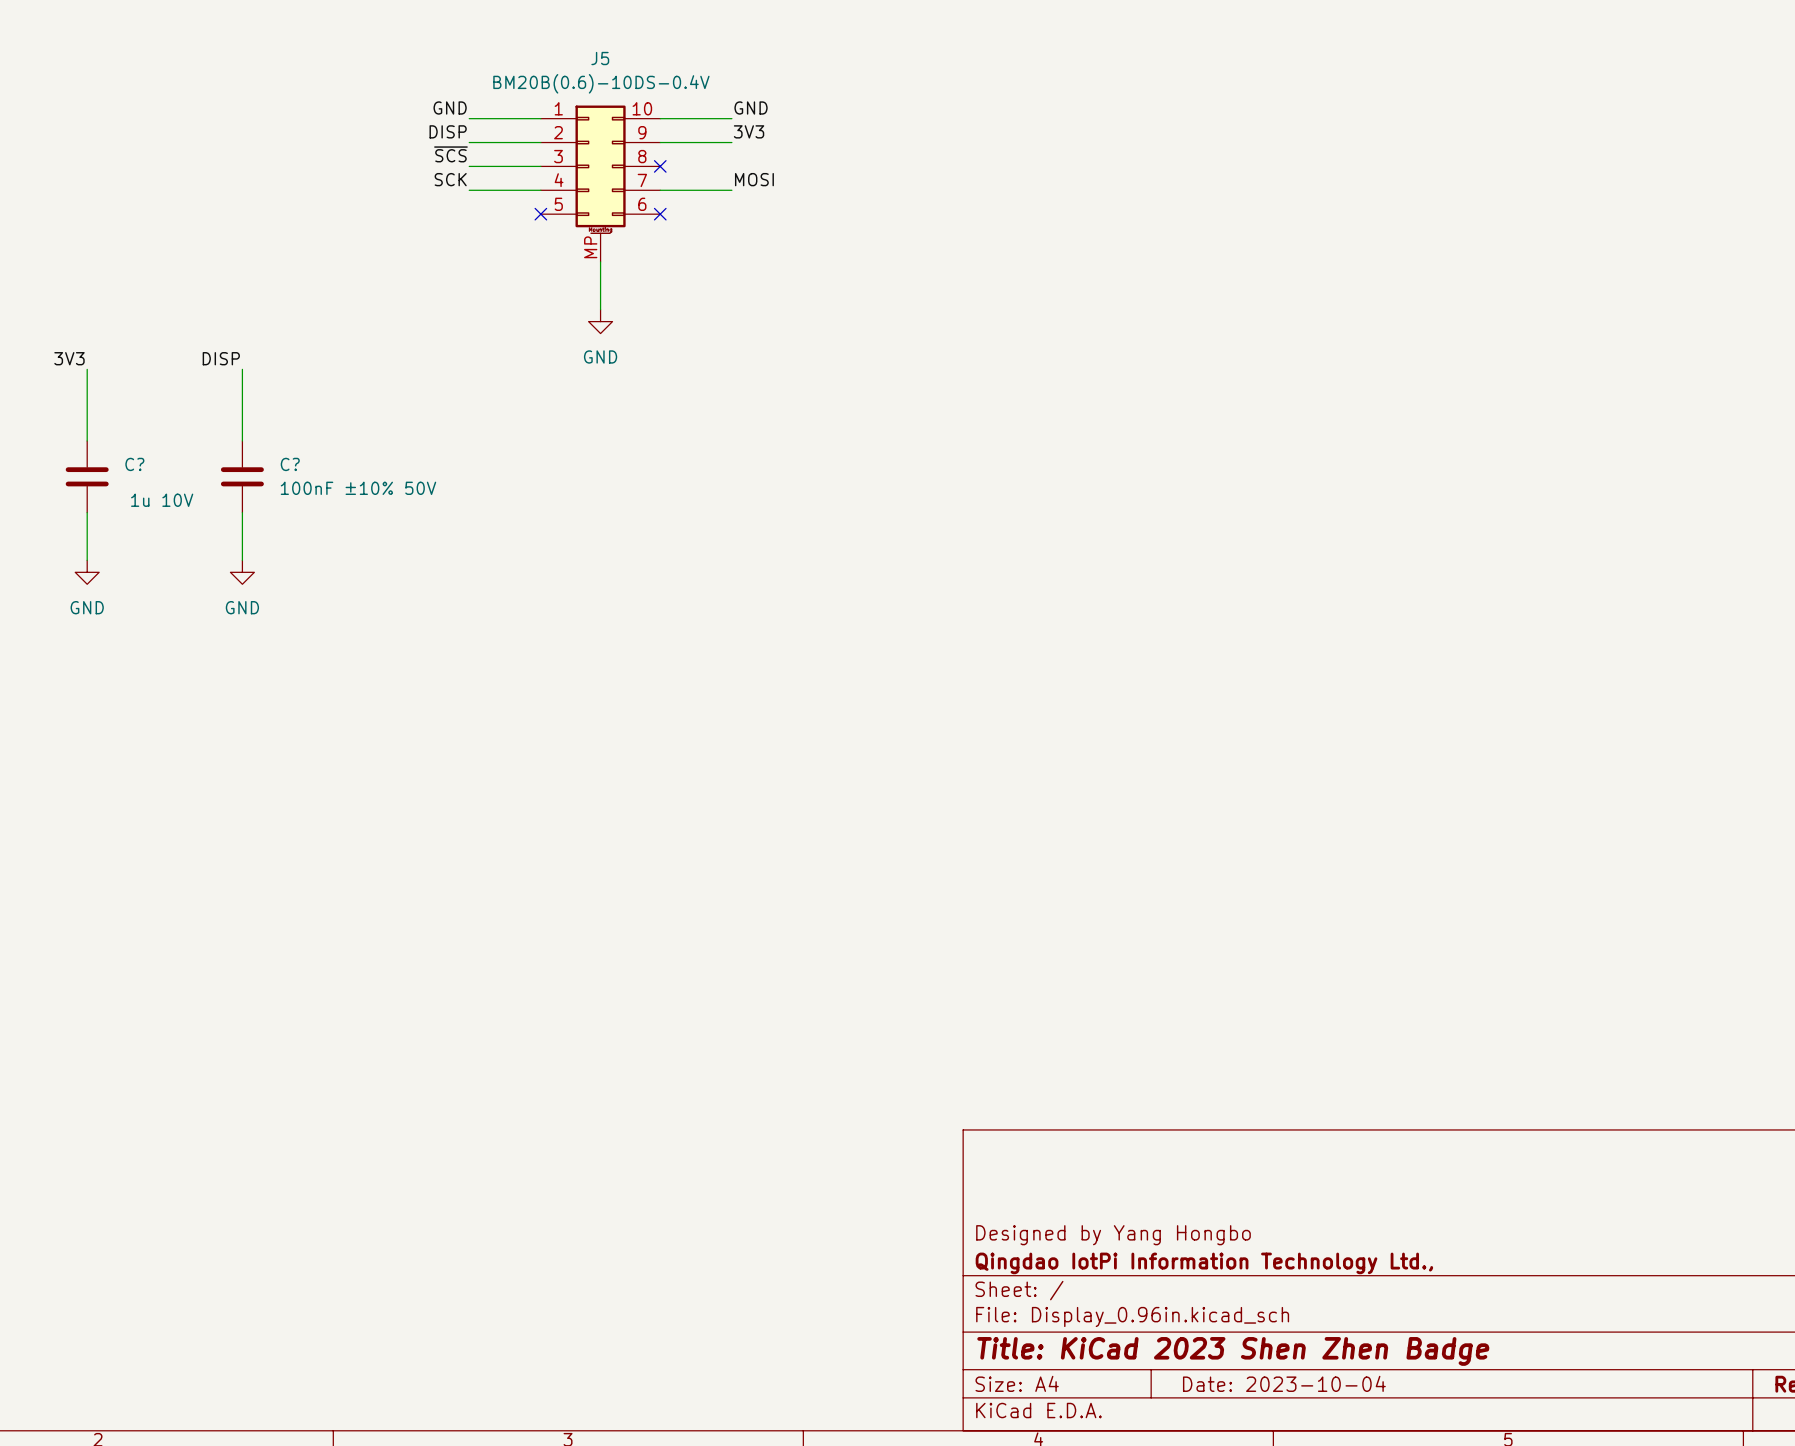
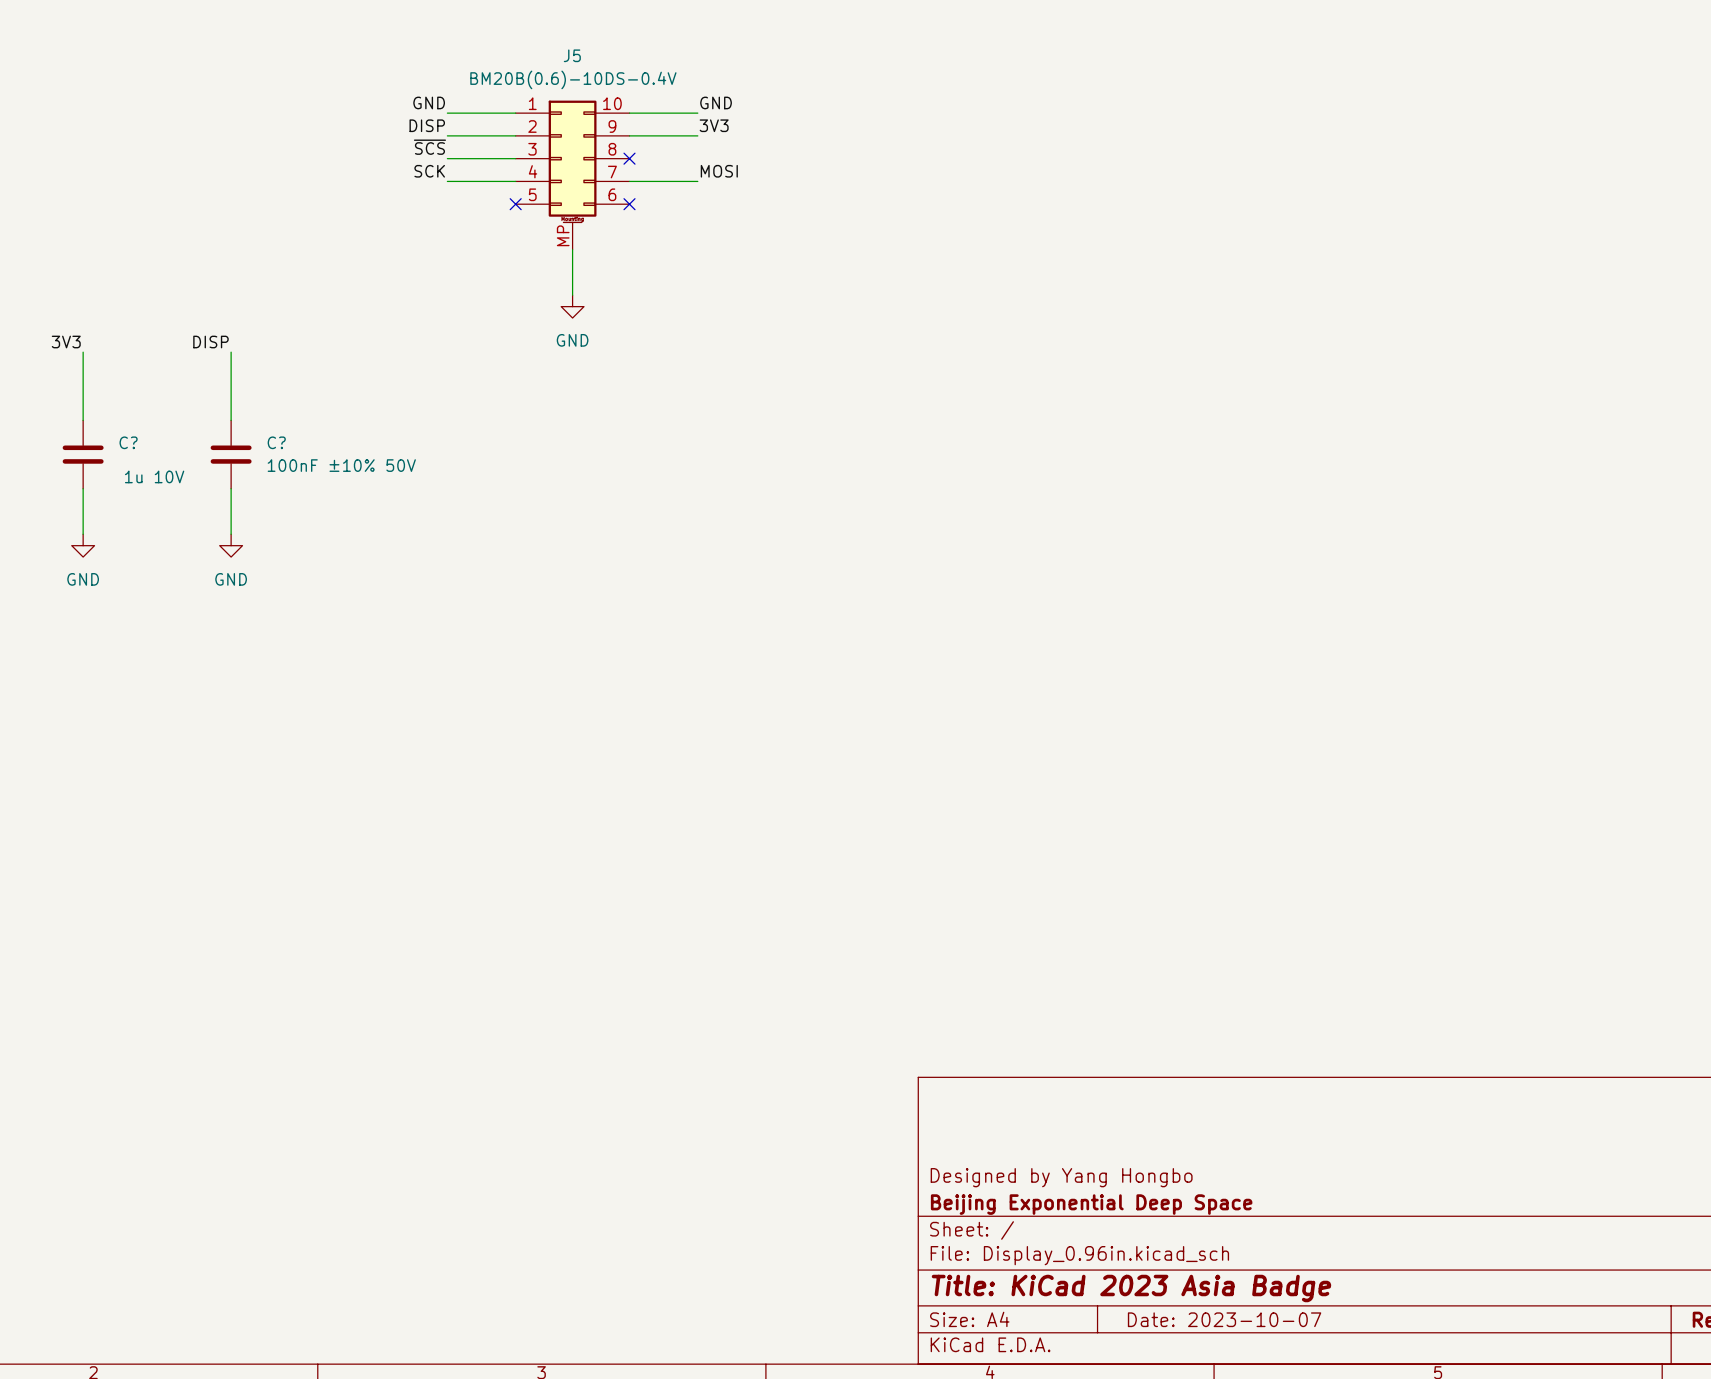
title block: Qingdao IotPi Information Technology Ltd., (1204, 1263) -> Beijing Exponential Deep Space (1091, 1204)
title block: Title: KiCad 2023 Shen Zhen Badge (1233, 1351) -> Title: KiCad 2023 Asia Badge (1131, 1288)
title block: Date: 2023-10-04 (1284, 1383) -> Date: 2023-10-07 (1224, 1319)

